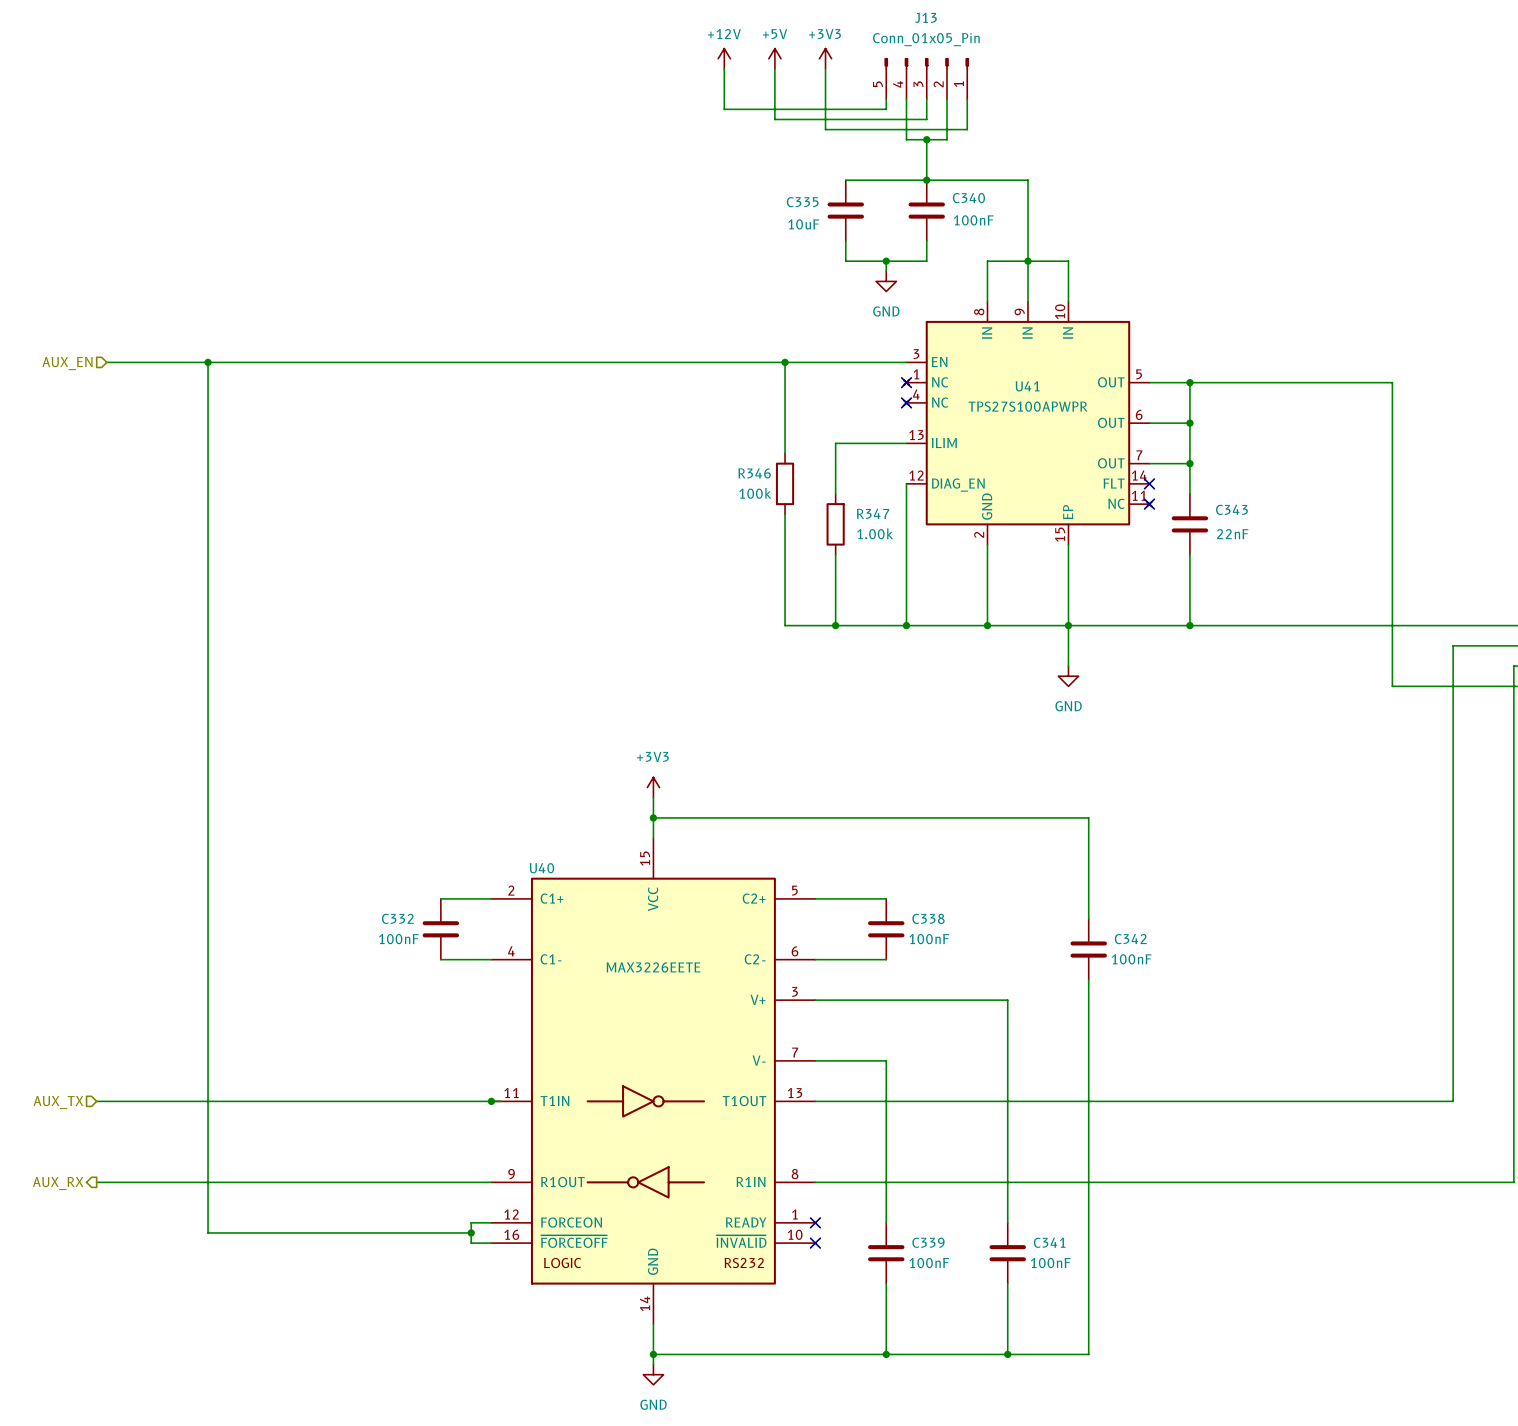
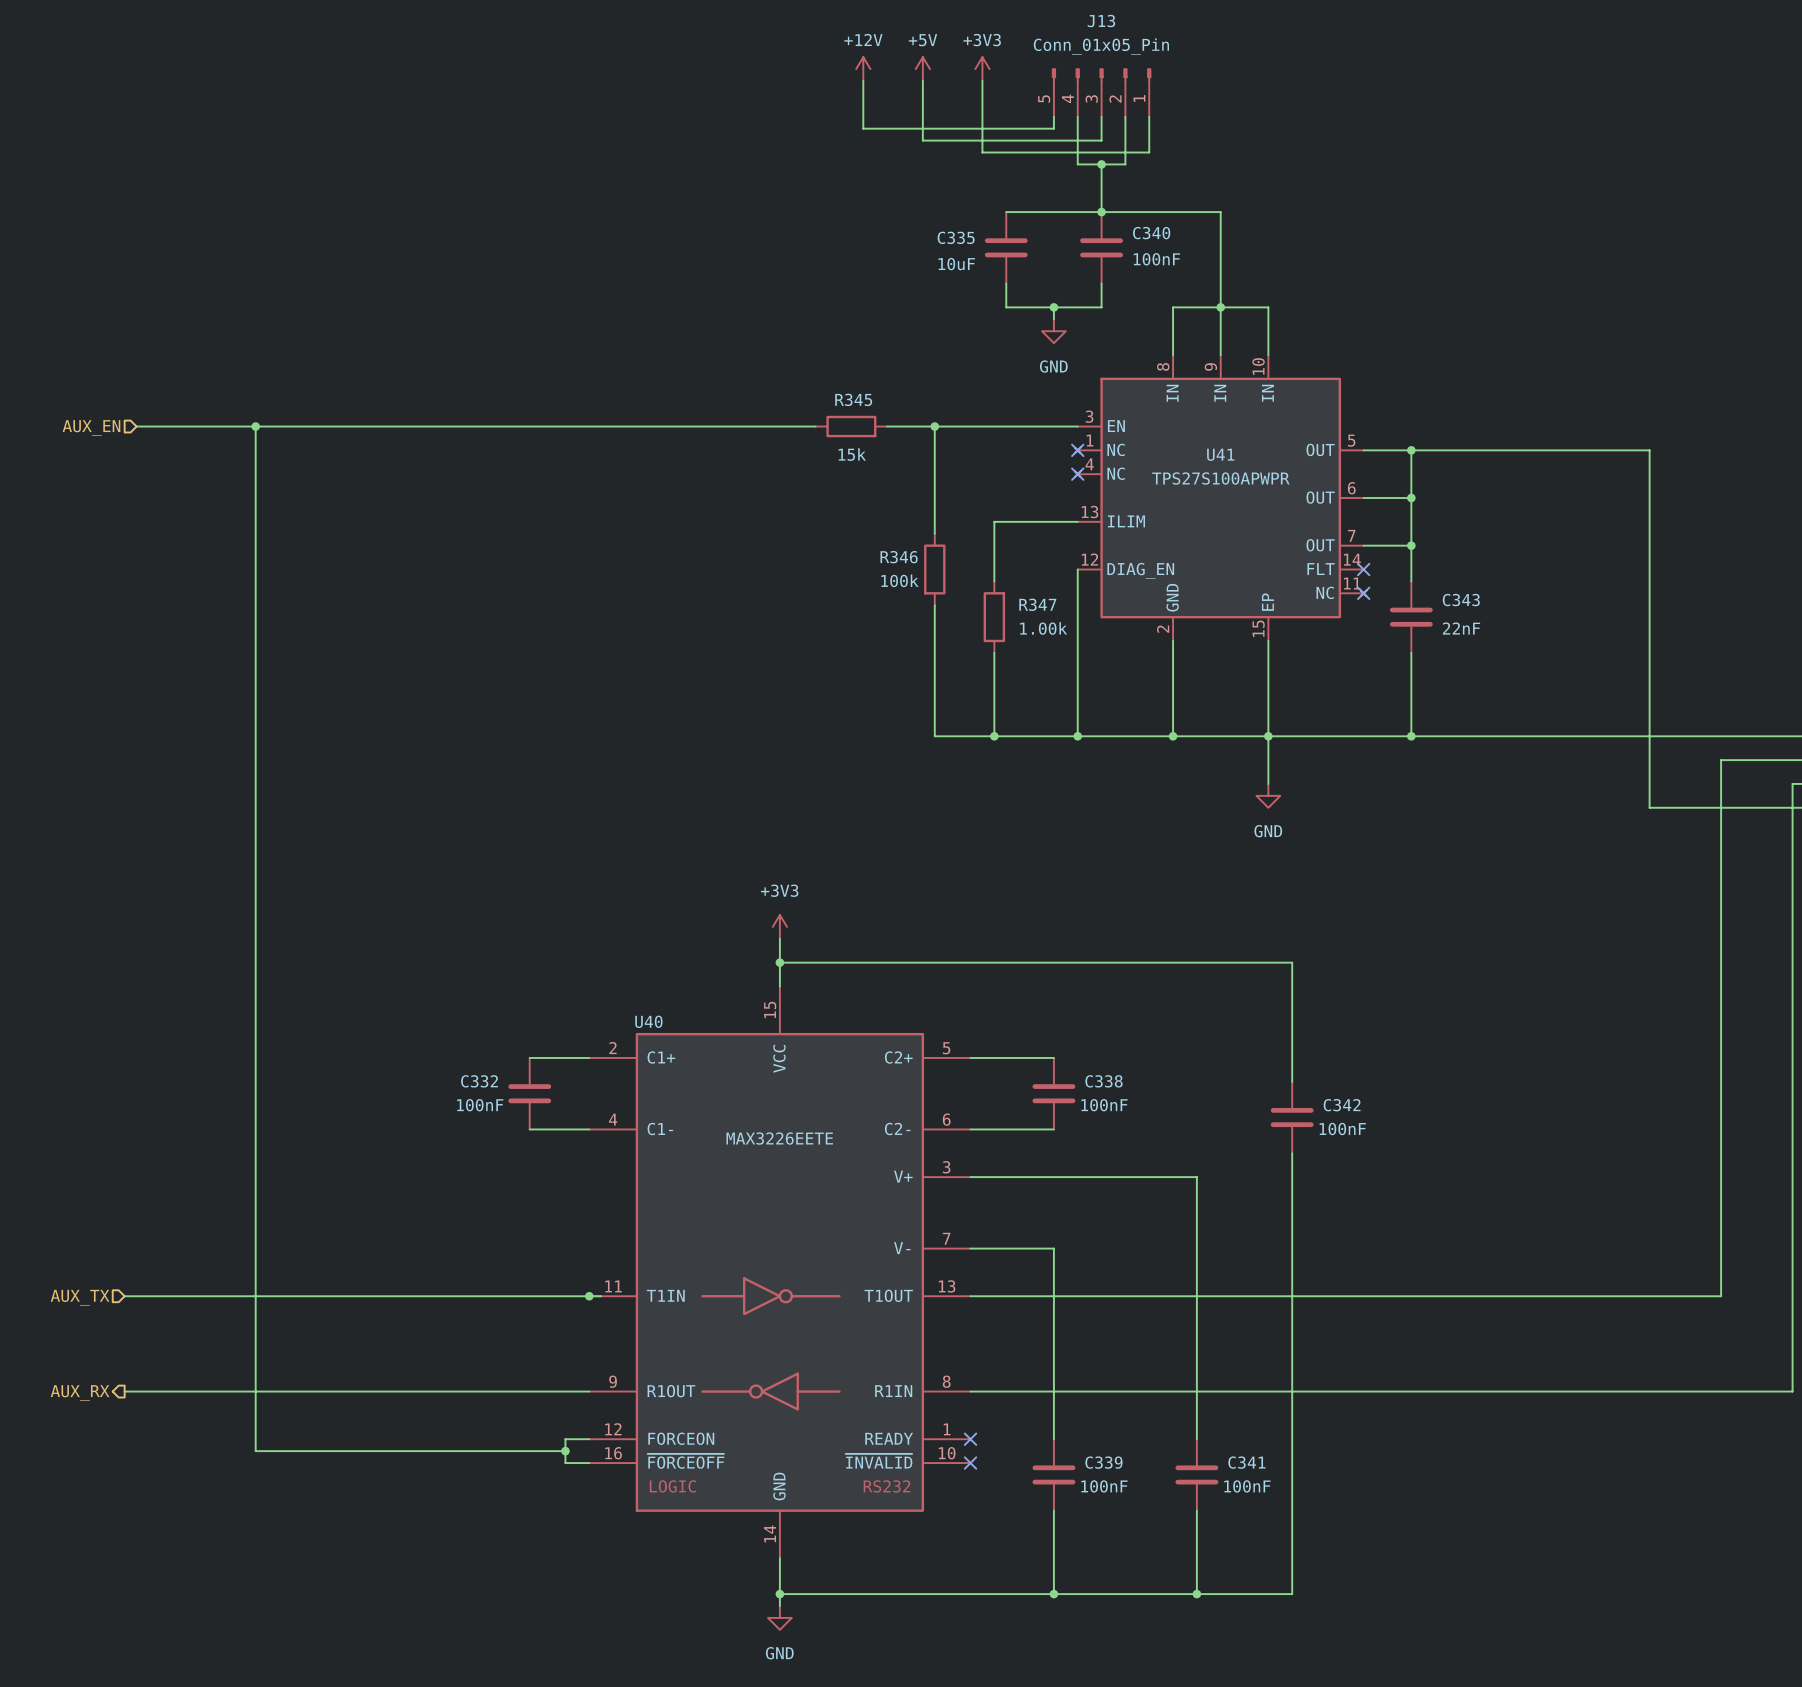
wire: (683, 362) (744, 362) -> none
R345: none -> 15k (851, 426)

